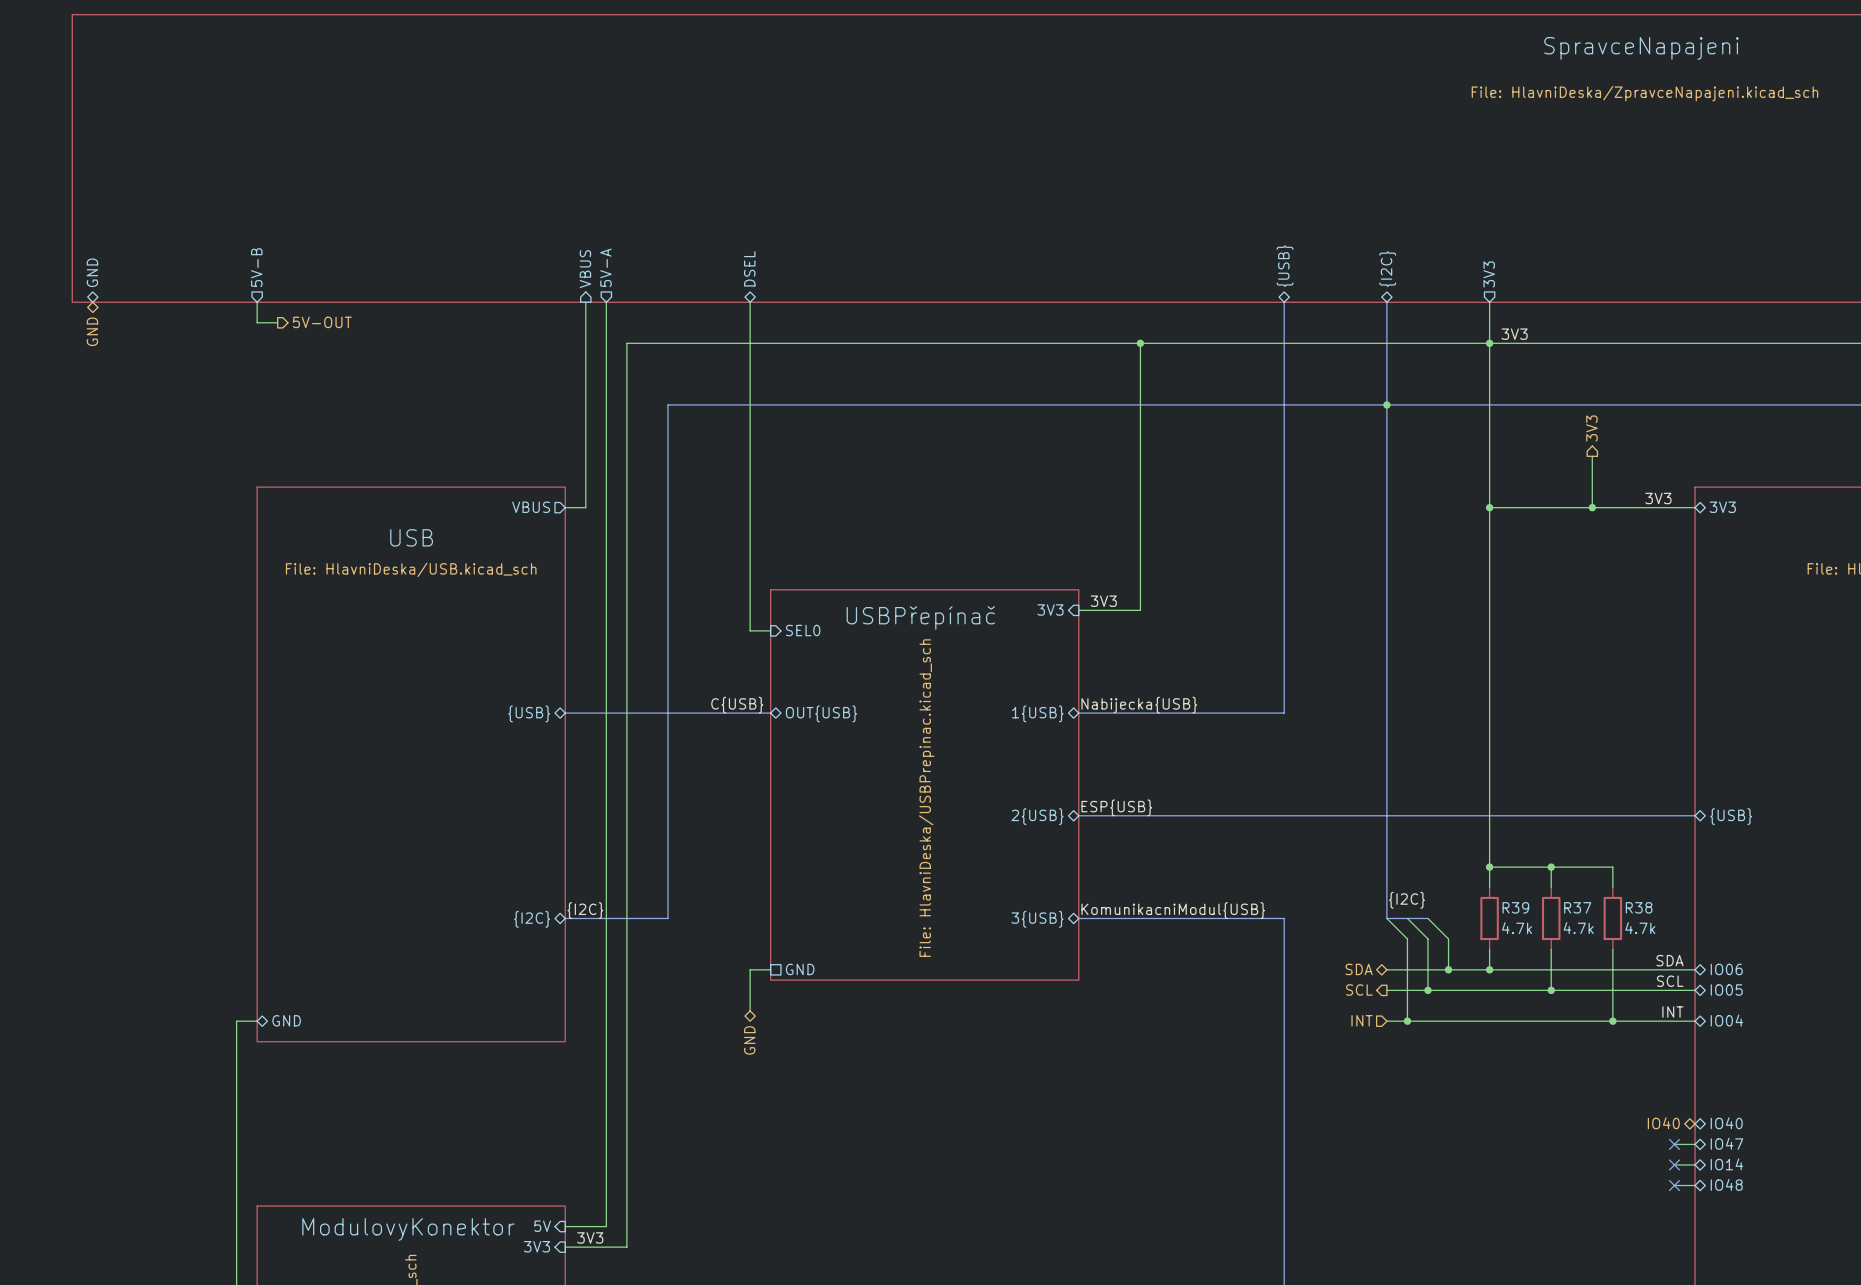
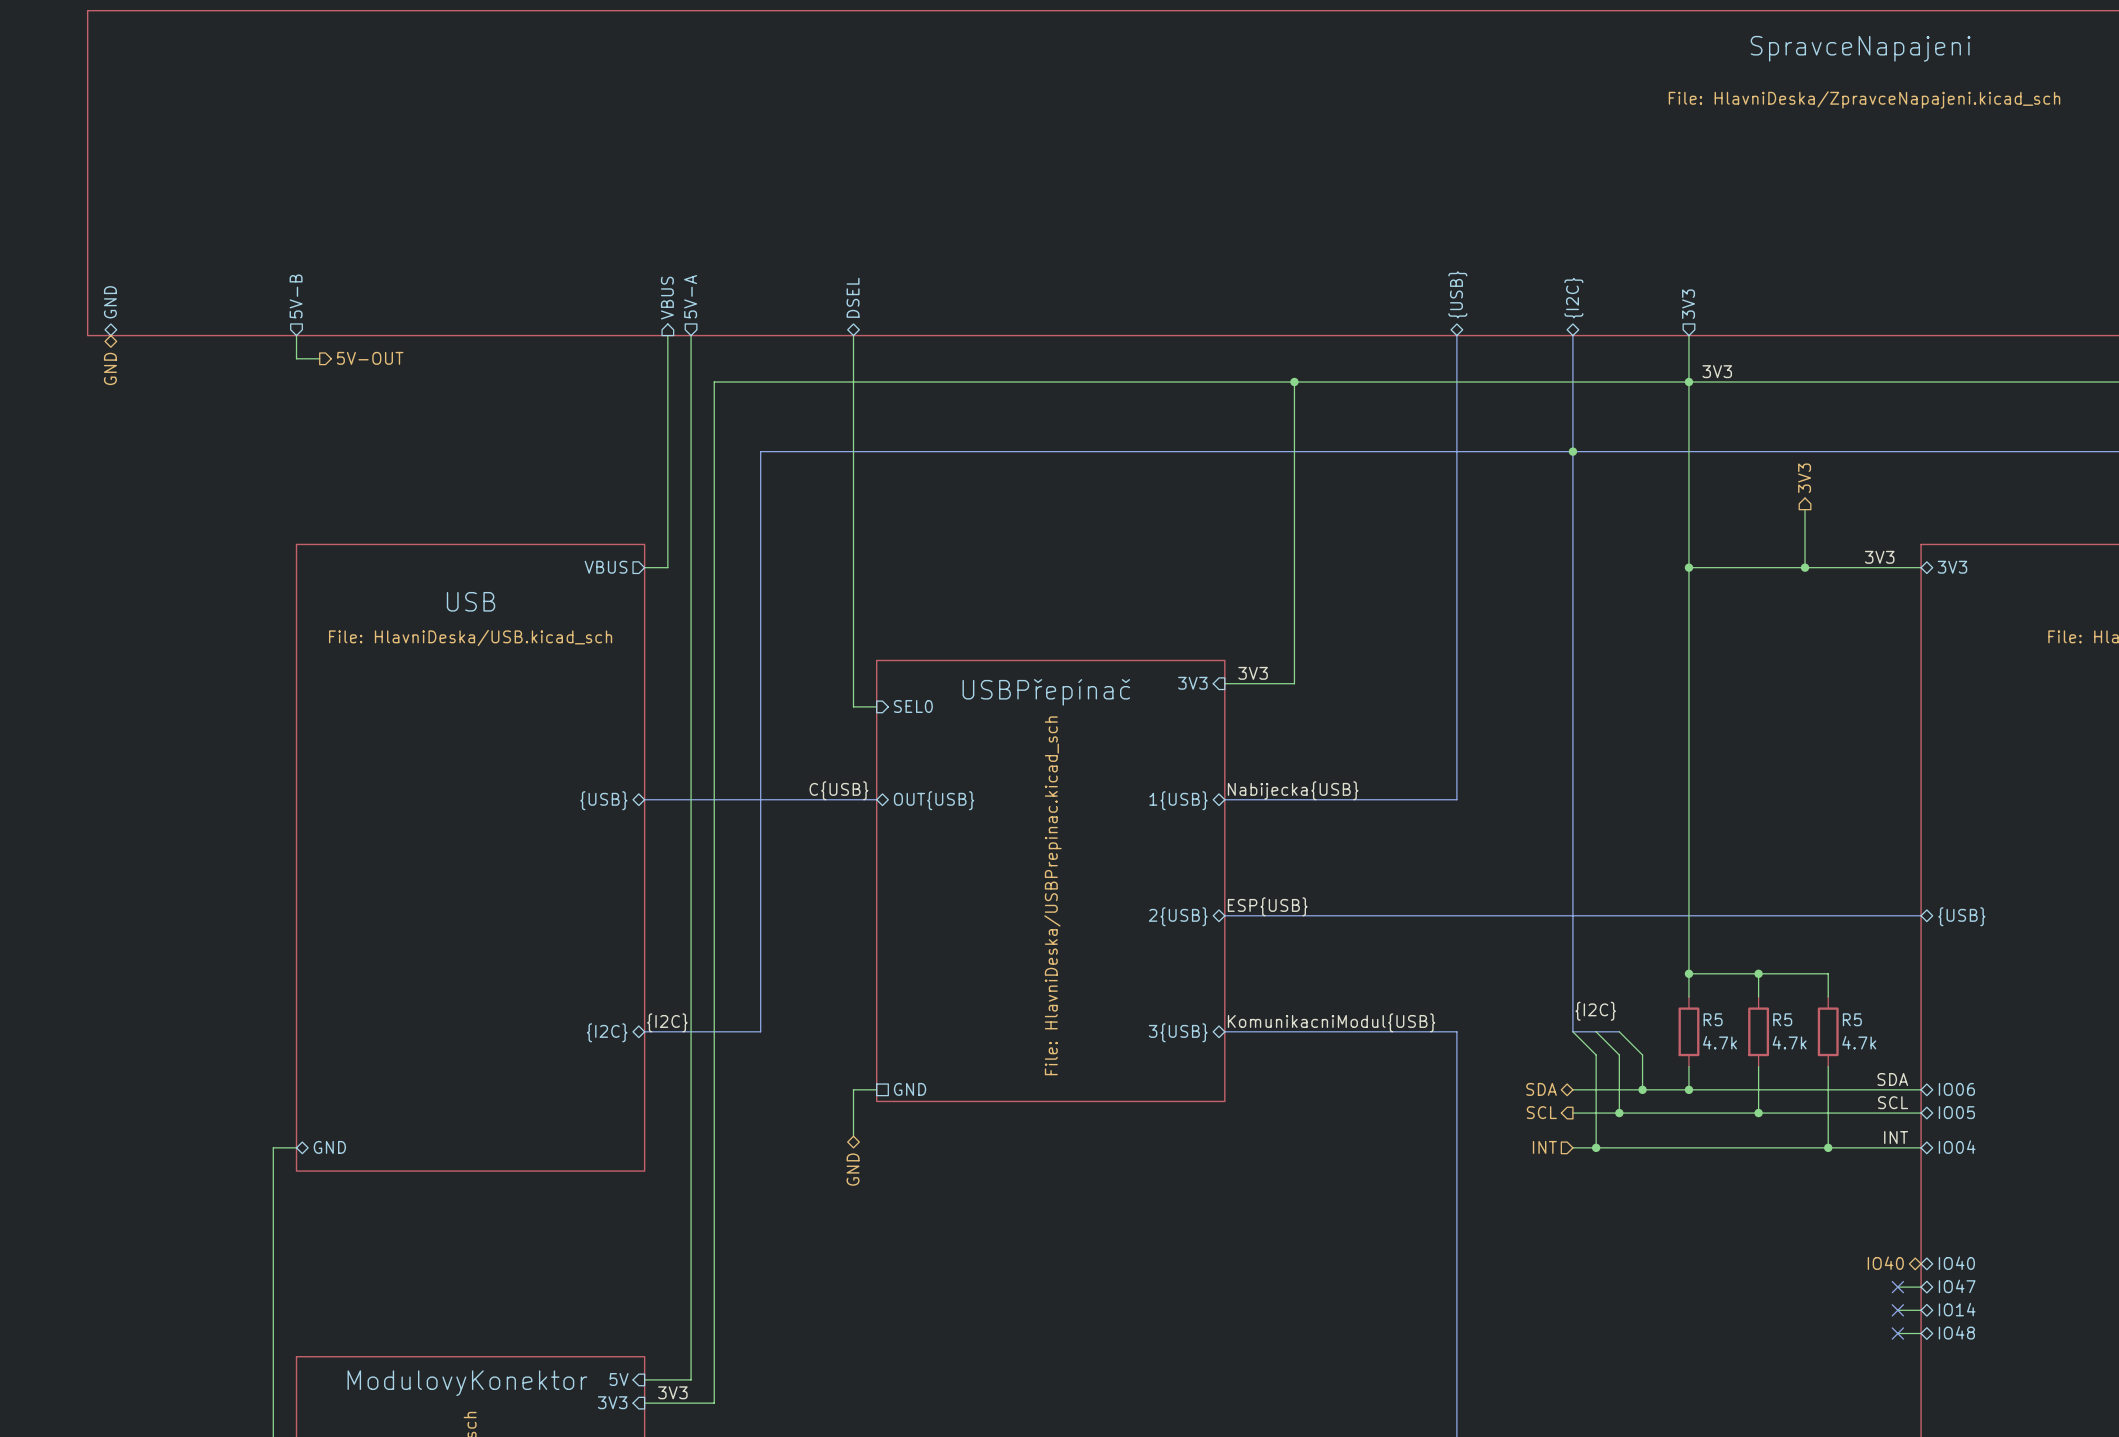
R39 name: R39 (1515, 907) -> R5 (1713, 1019)
R37 name: R37 (1577, 907) -> R5 (1782, 1019)
R38 name: R38 (1639, 907) -> R5 (1852, 1019)

